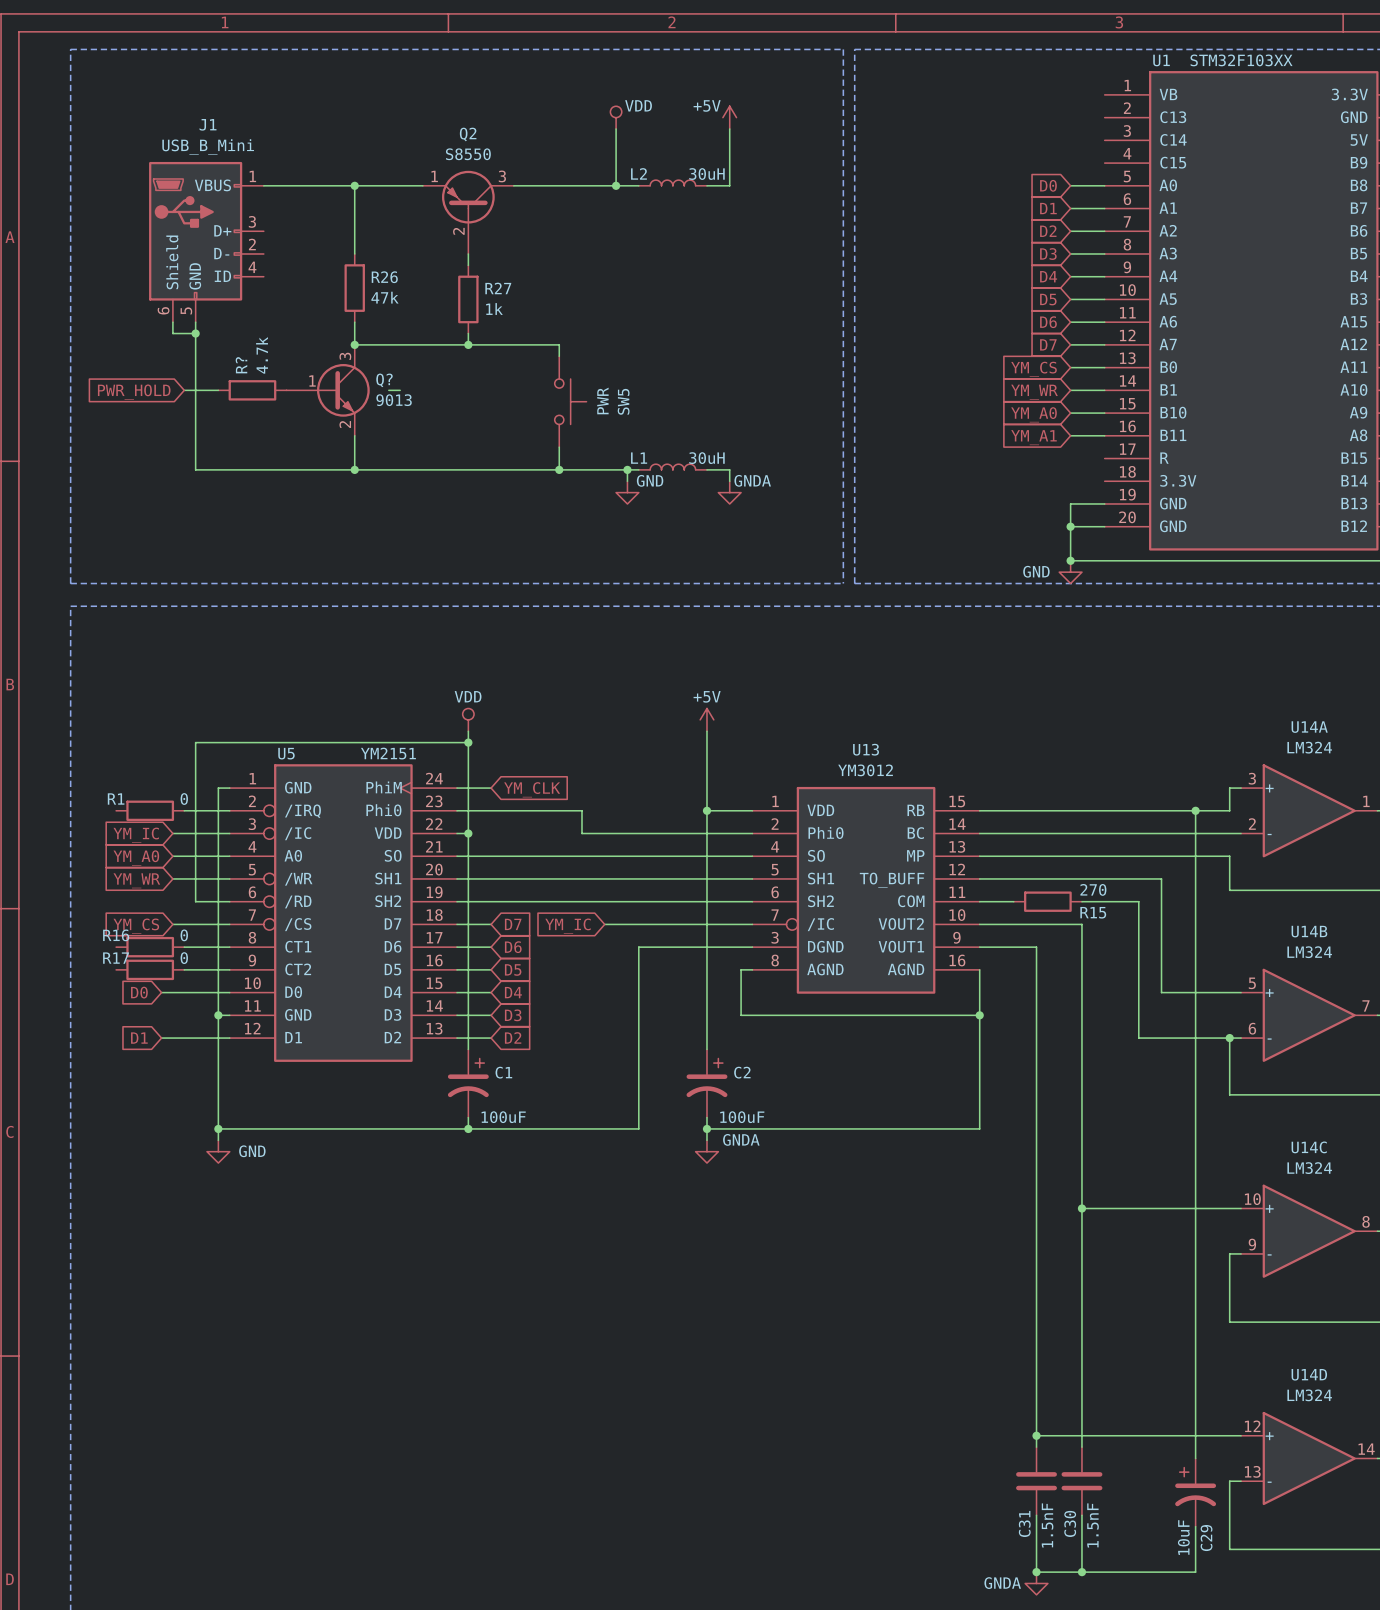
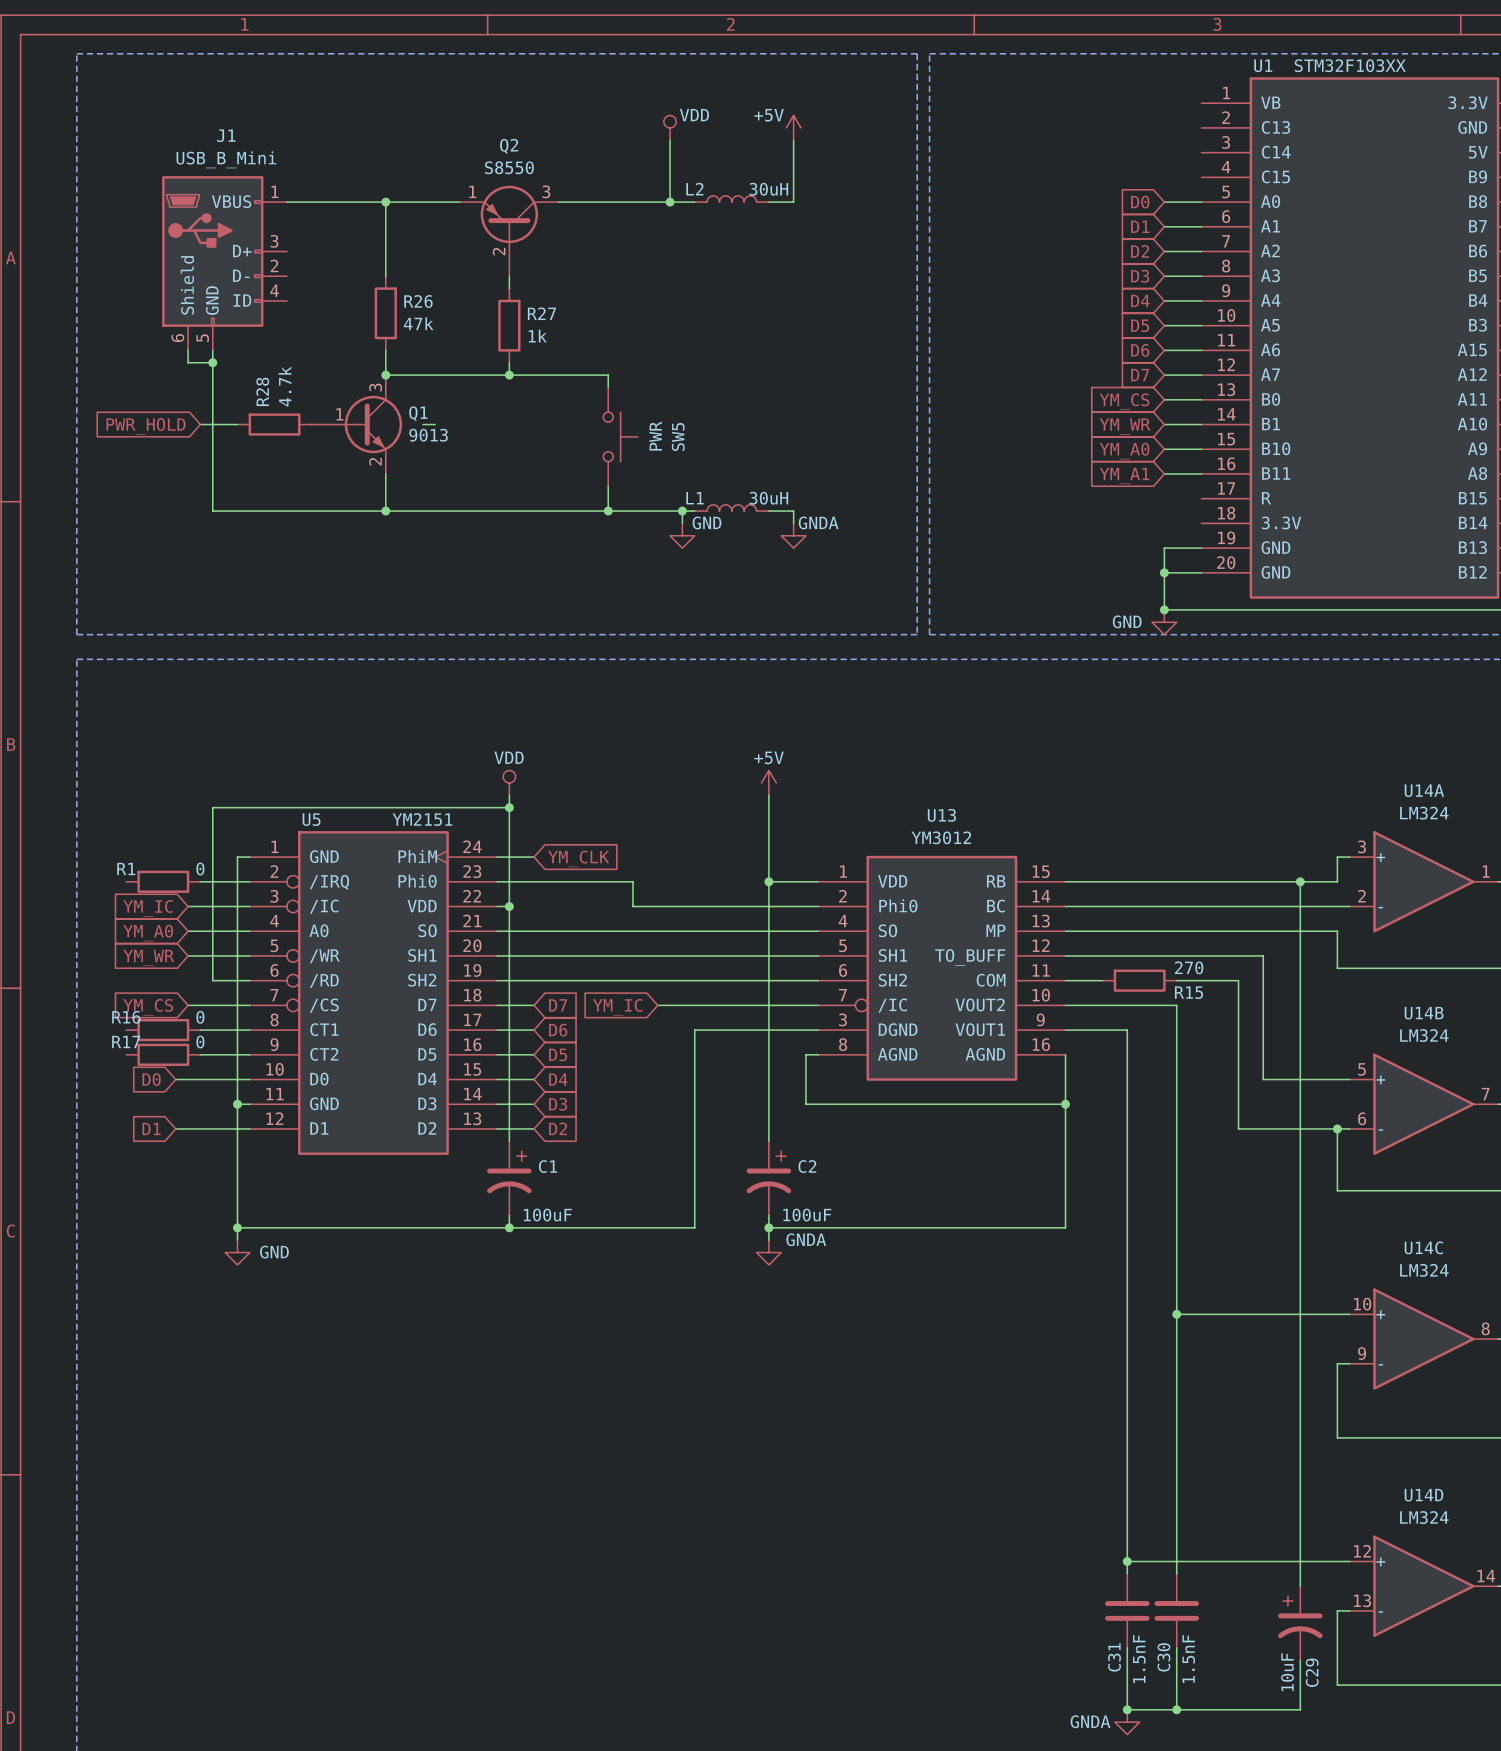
R? name: R? (241, 365) -> R28 (262, 391)
Q? name: Q? (384, 380) -> Q1 (418, 413)

